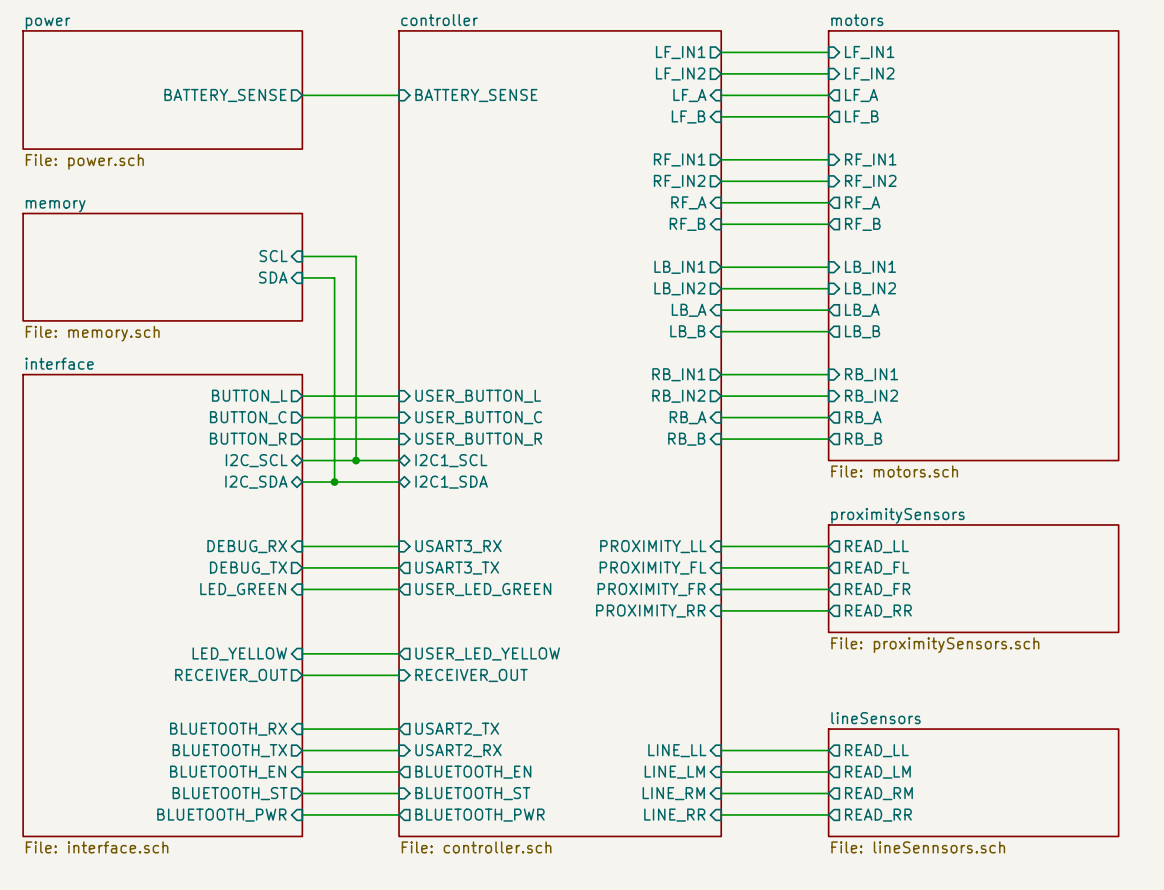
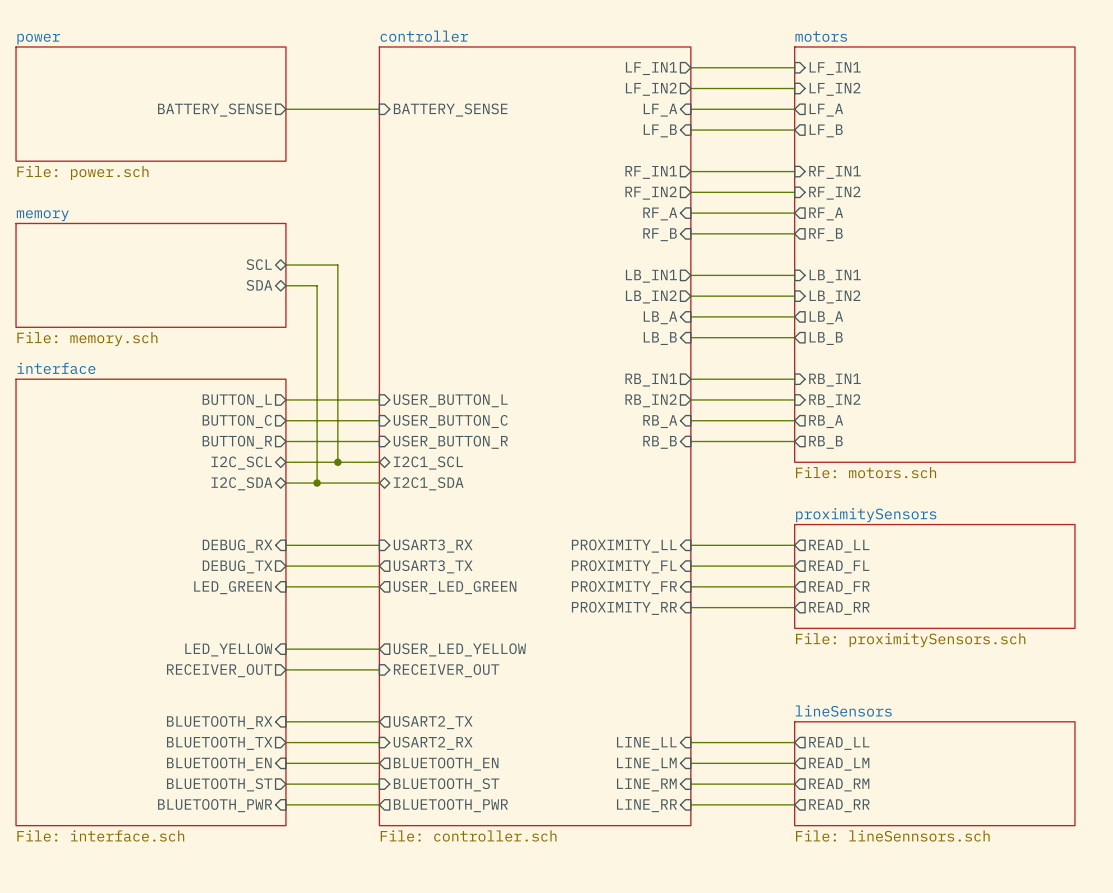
sheet pin shape: input (273, 256) -> bidirectional (259, 264)
sheet pin shape: input (273, 277) -> bidirectional (259, 285)

